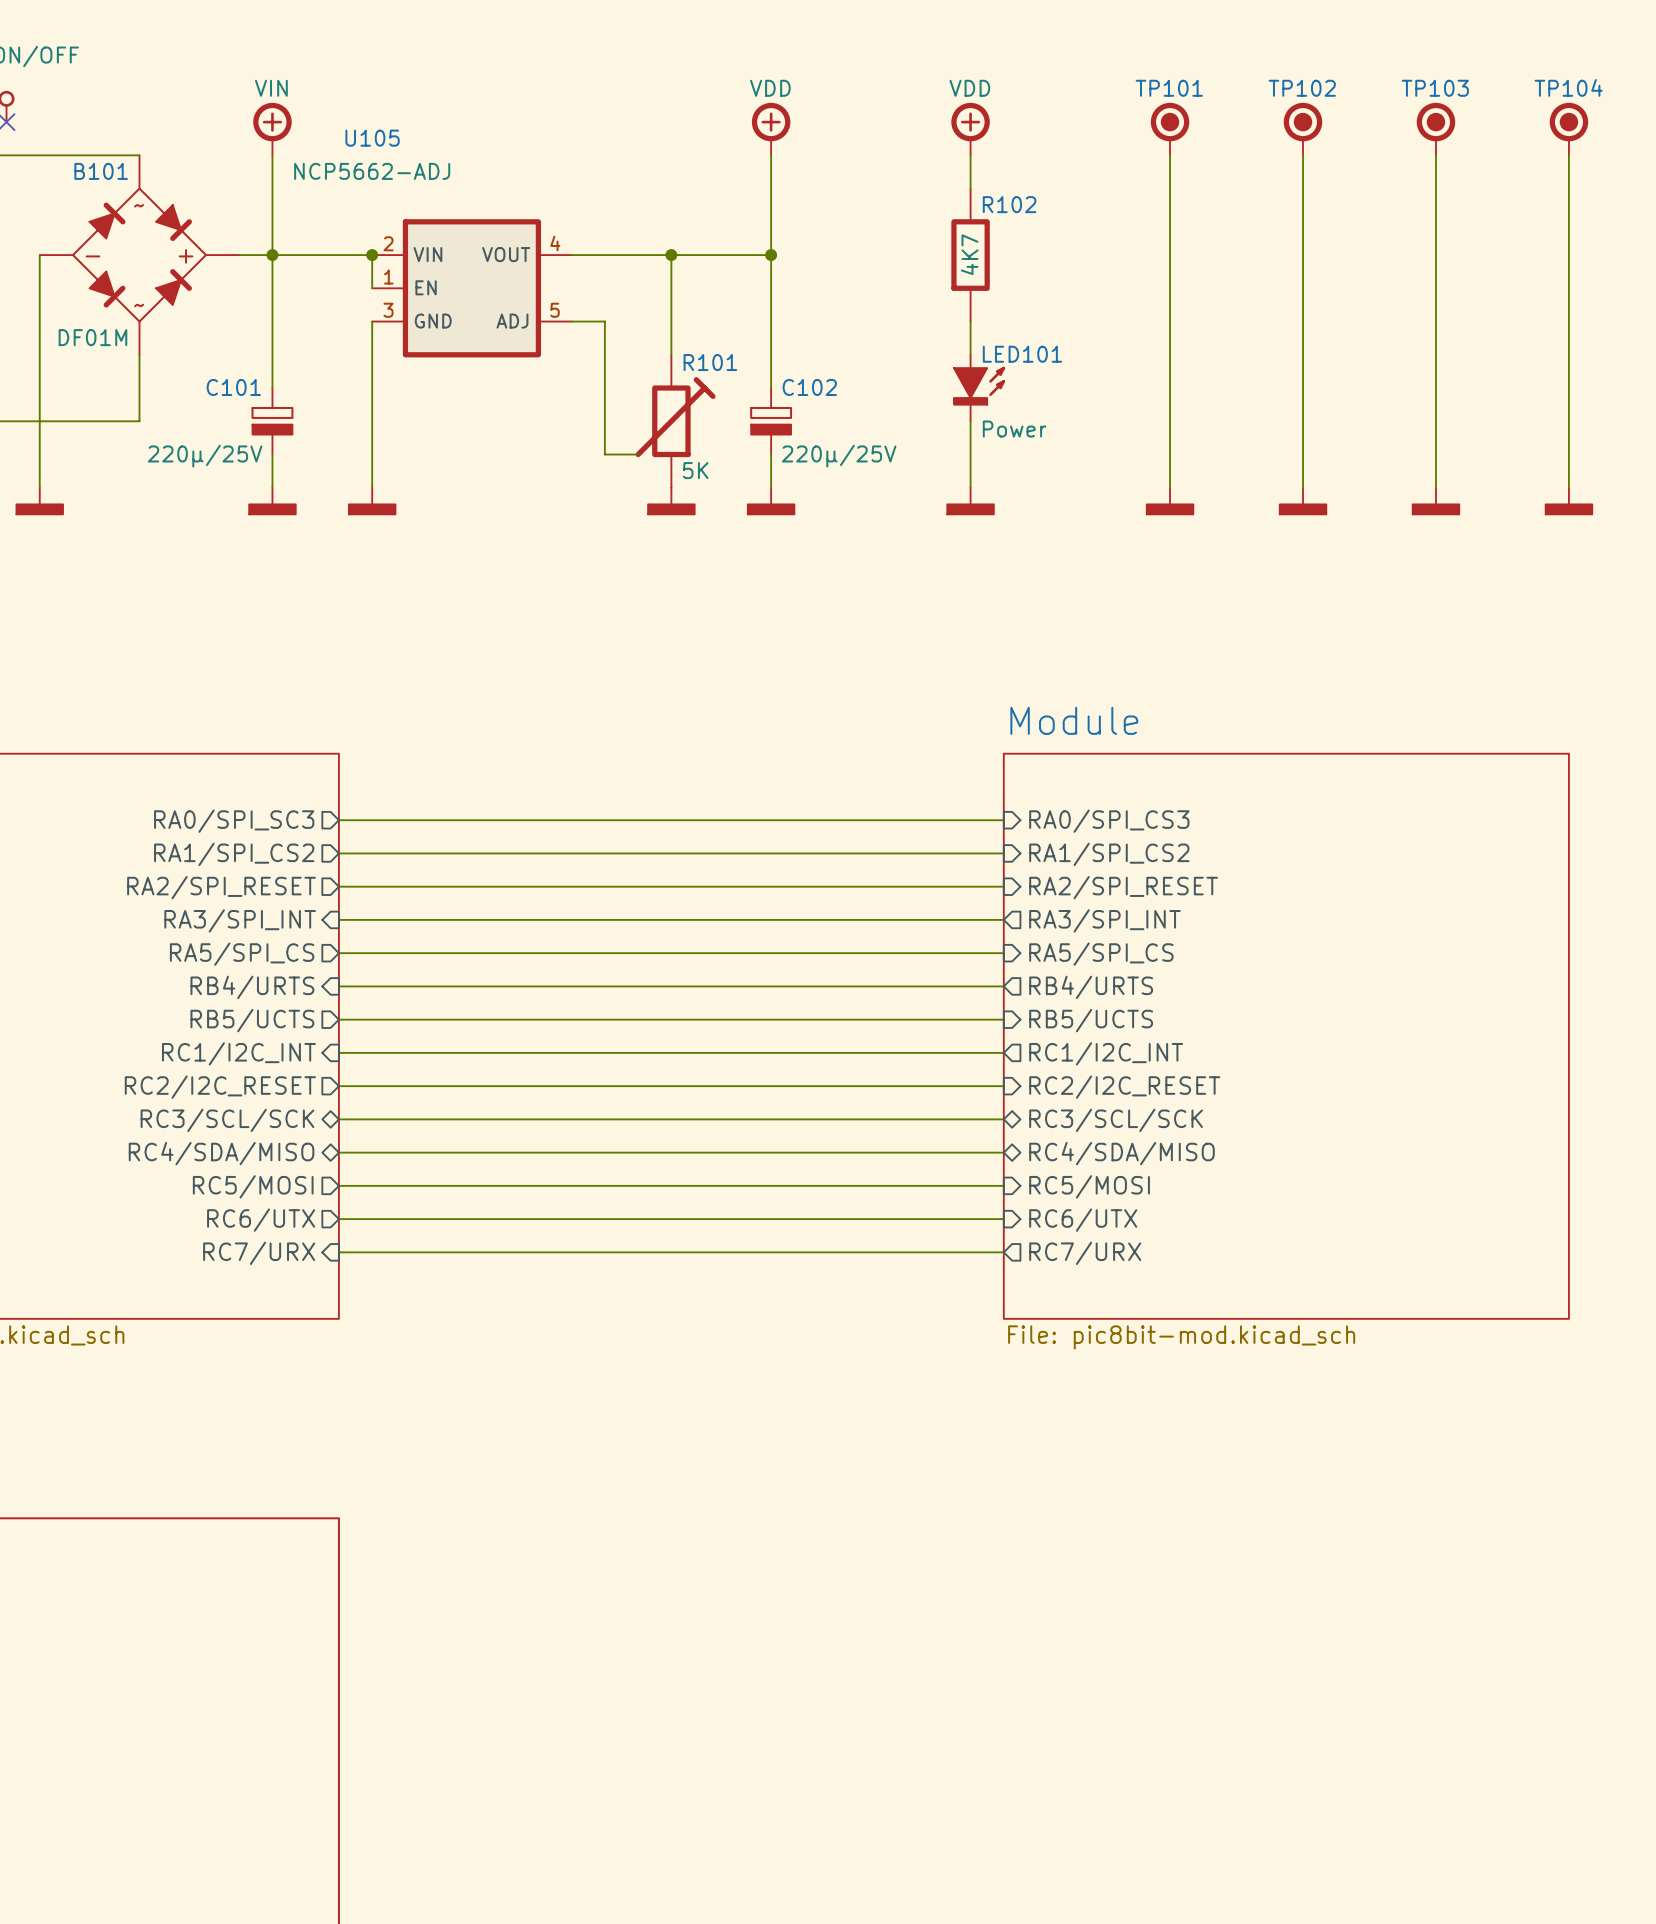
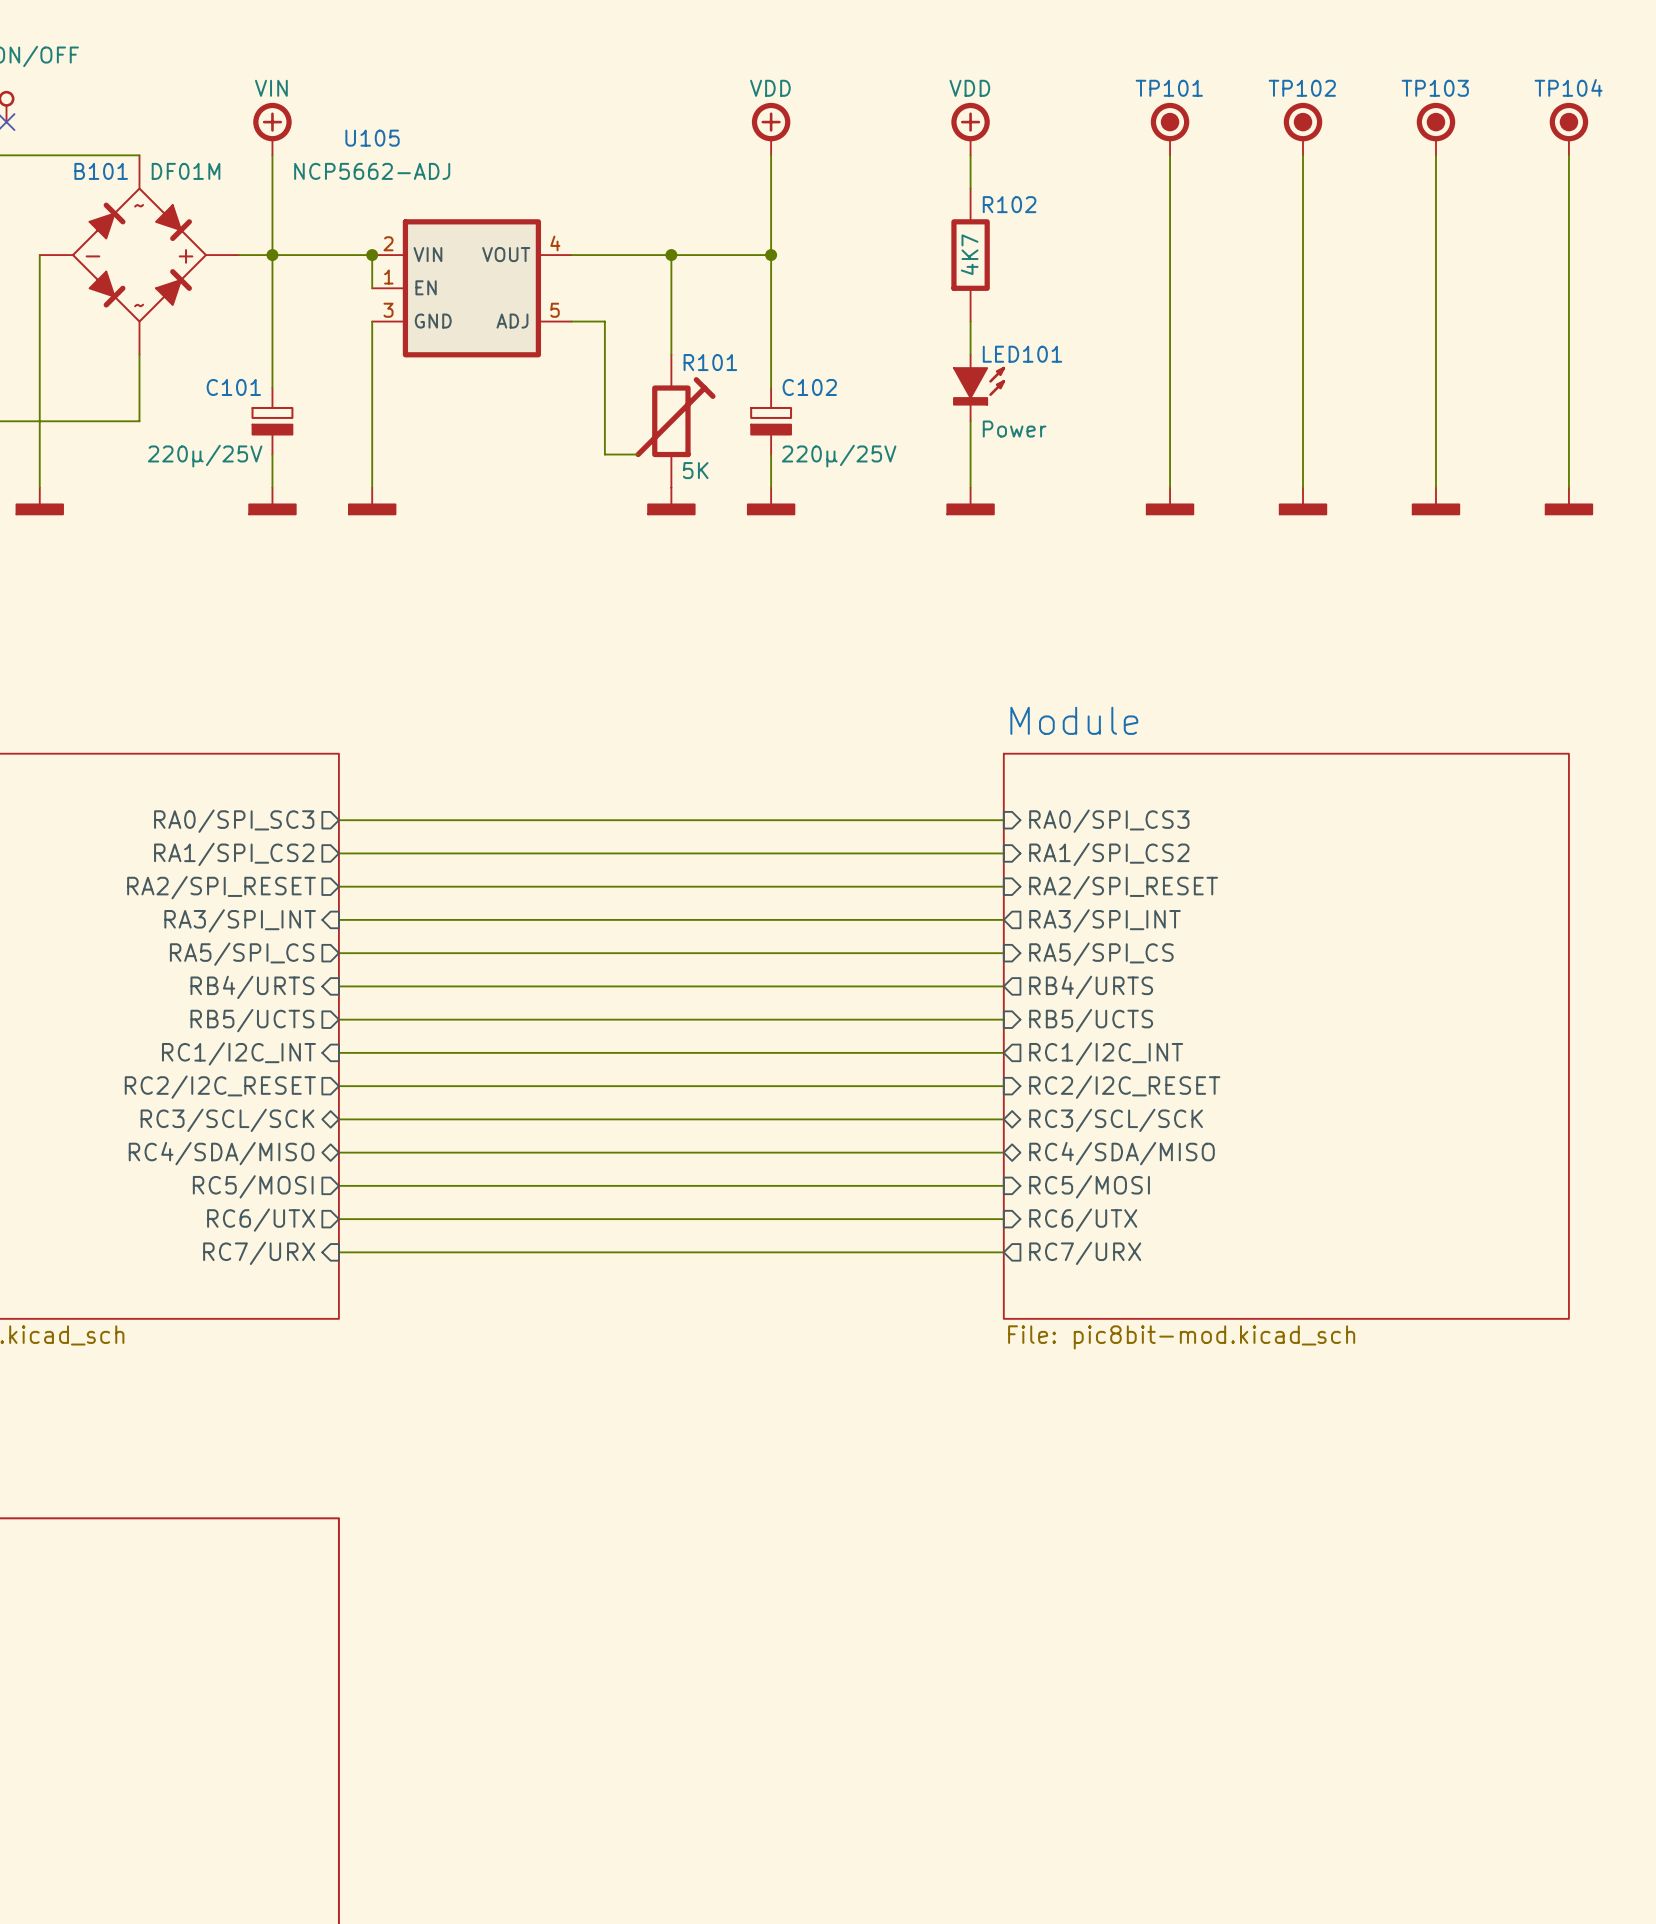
B101 value position: DF01M (92, 337) -> DF01M (186, 171)

